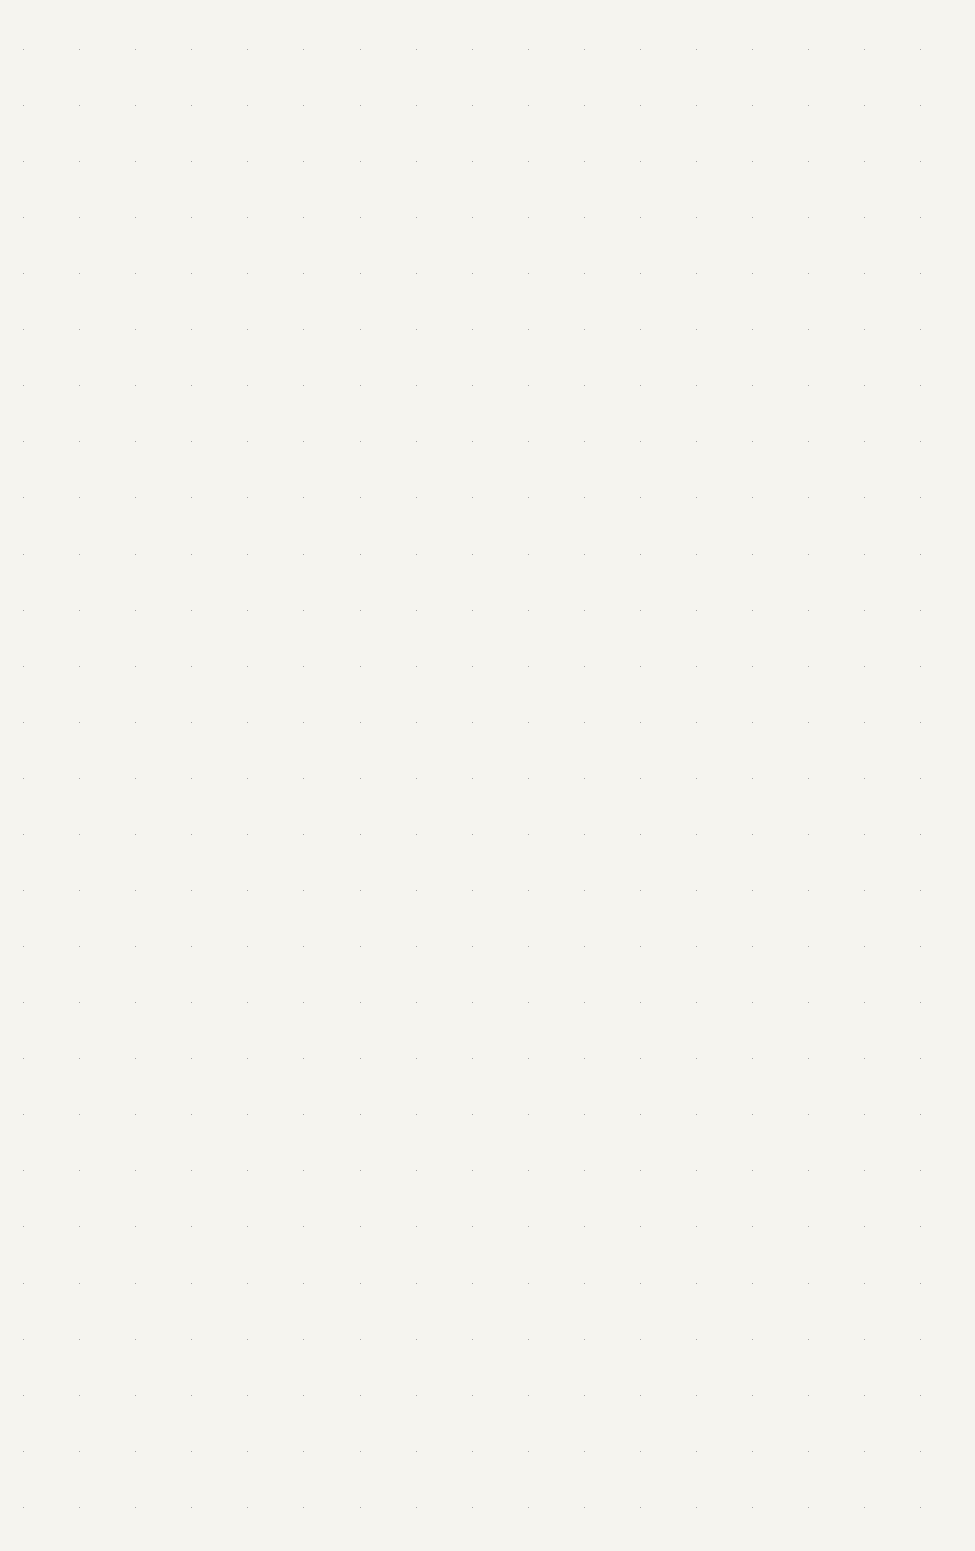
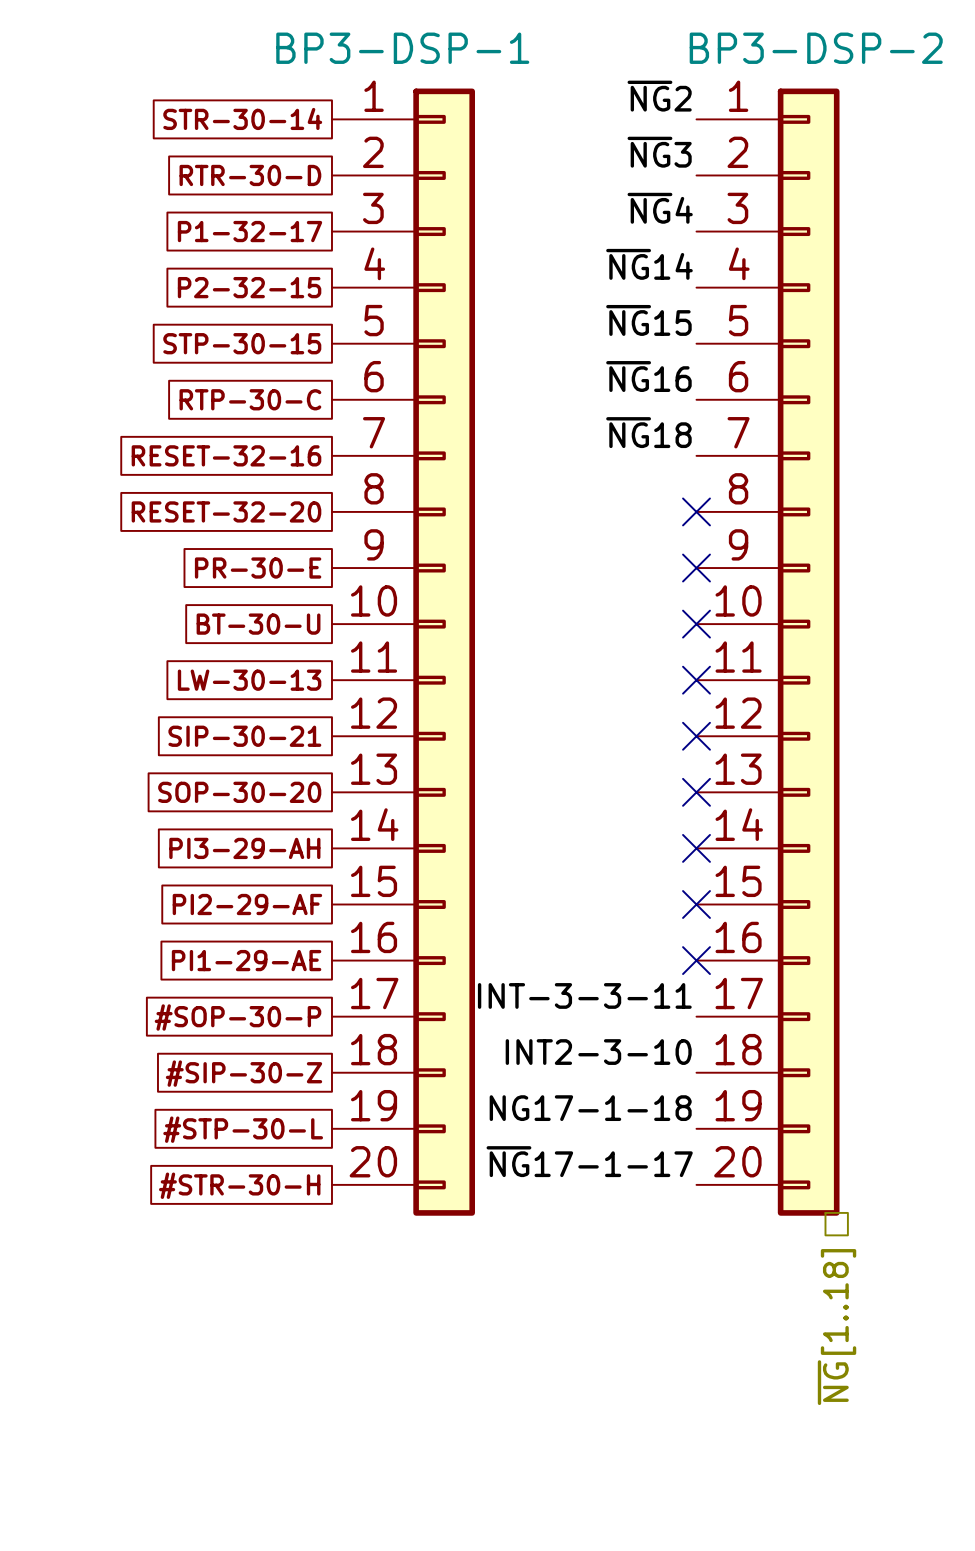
label: none -> ~{NG}2 (659, 96)
global label: none -> STR-30-14 (242, 118)
label: none -> ~{NG}3 (659, 152)
global label: none -> RTR-30-D (250, 175)
label: none -> ~{NG}4 (660, 208)
global label: none -> P1-32-17 (249, 231)
label: none -> ~{NG}14 (649, 264)
global label: none -> P2-32-15 (249, 287)
label: none -> ~{NG}15 (648, 320)
global label: none -> STP-30-15 (242, 343)
label: none -> ~{NG}16 (648, 376)
global label: none -> RTP-30-C (250, 399)
label: none -> ~{NG}18 (648, 432)
global label: none -> RESET-32-16 (226, 455)
global label: none -> RESET-32-20 (226, 511)
no-connect mark: none -> (696, 511)
global label: none -> PR-30-E (258, 568)
no-connect mark: none -> (696, 568)
global label: none -> BT-30-U (258, 624)
no-connect mark: none -> (696, 624)
BP3-DSP-1: none -> (403, 652)
BP3-DSP-2: none -> (768, 652)
global label: none -> LW-30-13 (249, 680)
no-connect mark: none -> (696, 680)
global label: none -> SIP-30-21 (244, 736)
no-connect mark: none -> (696, 736)
global label: none -> SOP-30-20 (239, 792)
no-connect mark: none -> (696, 792)
global label: none -> PI3-29-AH (244, 848)
no-connect mark: none -> (696, 848)
global label: none -> PI2-29-AF (247, 904)
no-connect mark: none -> (696, 904)
global label: none -> PI1-29-AE (246, 960)
no-connect mark: none -> (696, 960)
label: none -> INT-3-3-11 (584, 995)
global label: none -> #SOP-30-P (238, 1017)
label: none -> INT2-3-10 (598, 1052)
global label: none -> #SIP-30-Z (244, 1073)
label: none -> NG17-1-18 (590, 1108)
global label: none -> #STP-30-L (243, 1129)
label: none -> ~{NG}17-1-17 (589, 1161)
global label: none -> #STR-30-H (239, 1185)
hierarchical label: none -> ~{NG}[1..18] (837, 1327)

